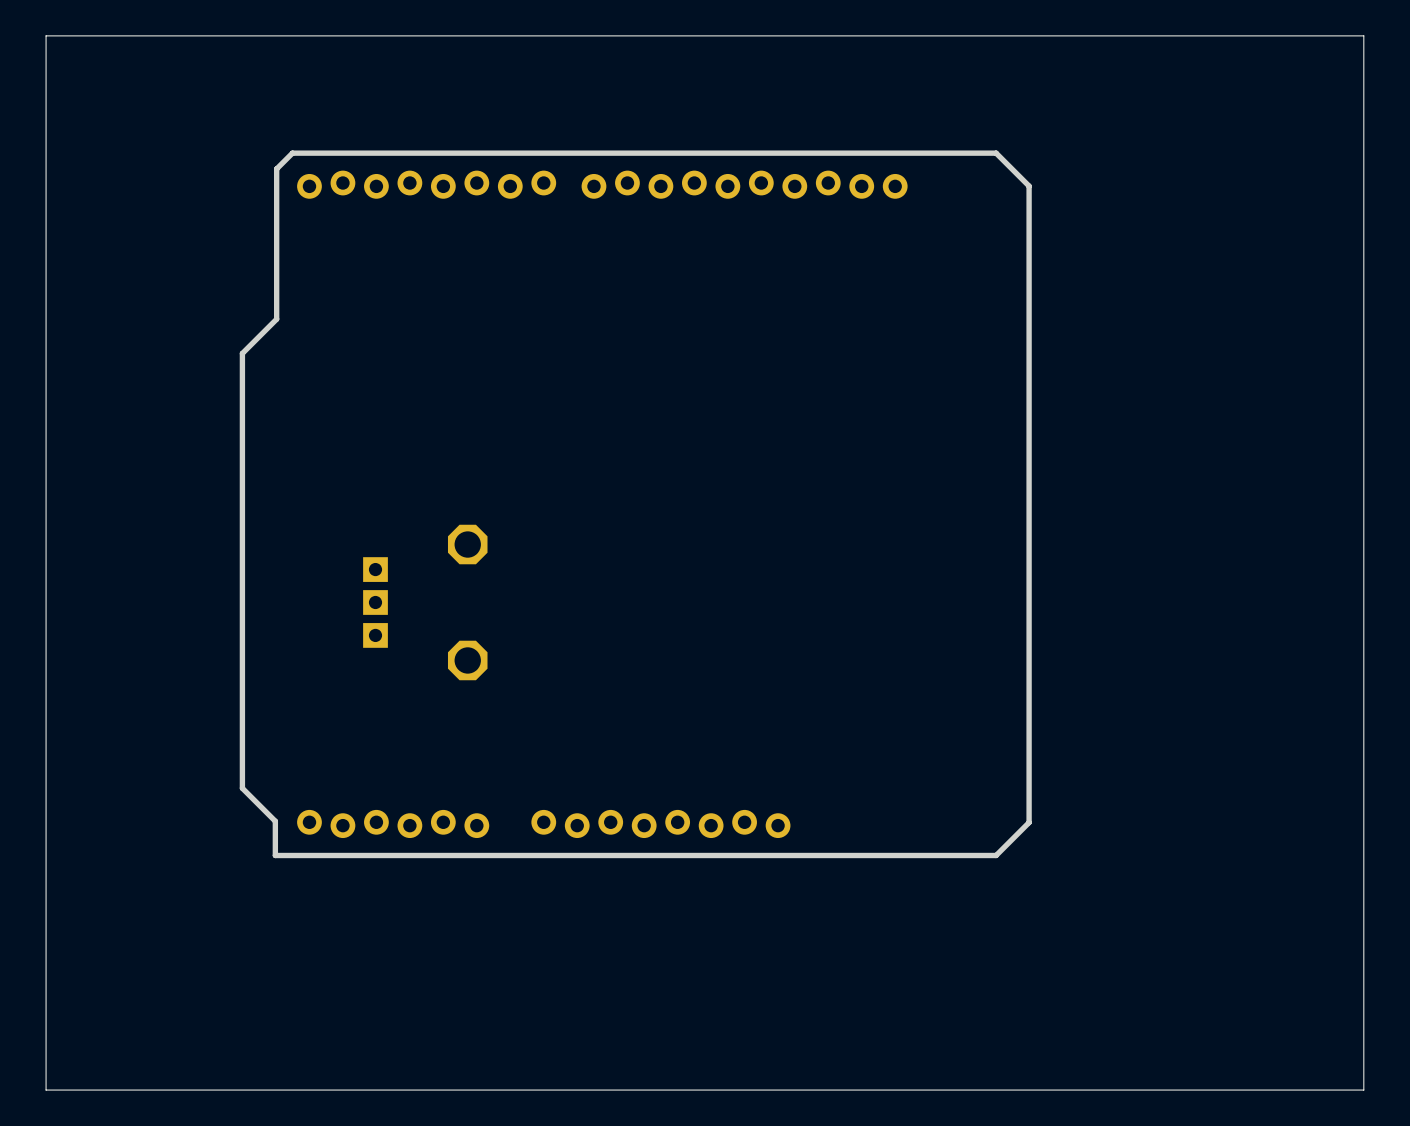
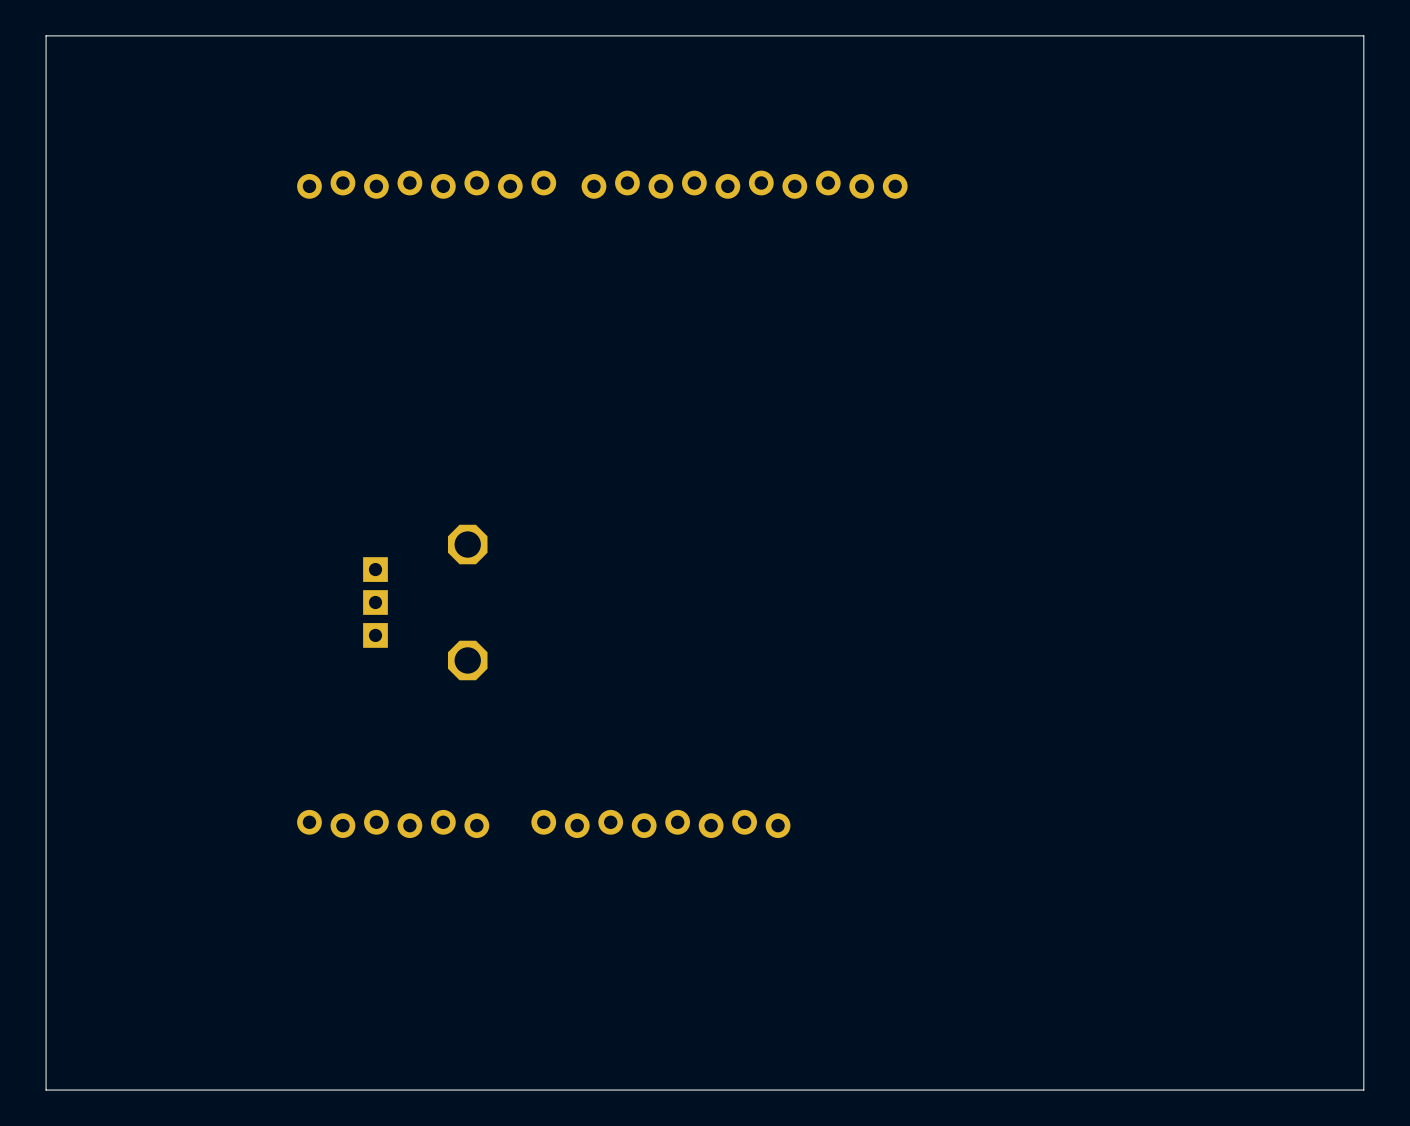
board edge: (996, 153) (1029, 186) (1029, 822) (996, 855) (275, 855) (275, 821) (242, 788) (242, 353) (276, 319) (276, 168) (292, 153) (996, 153) -> none

